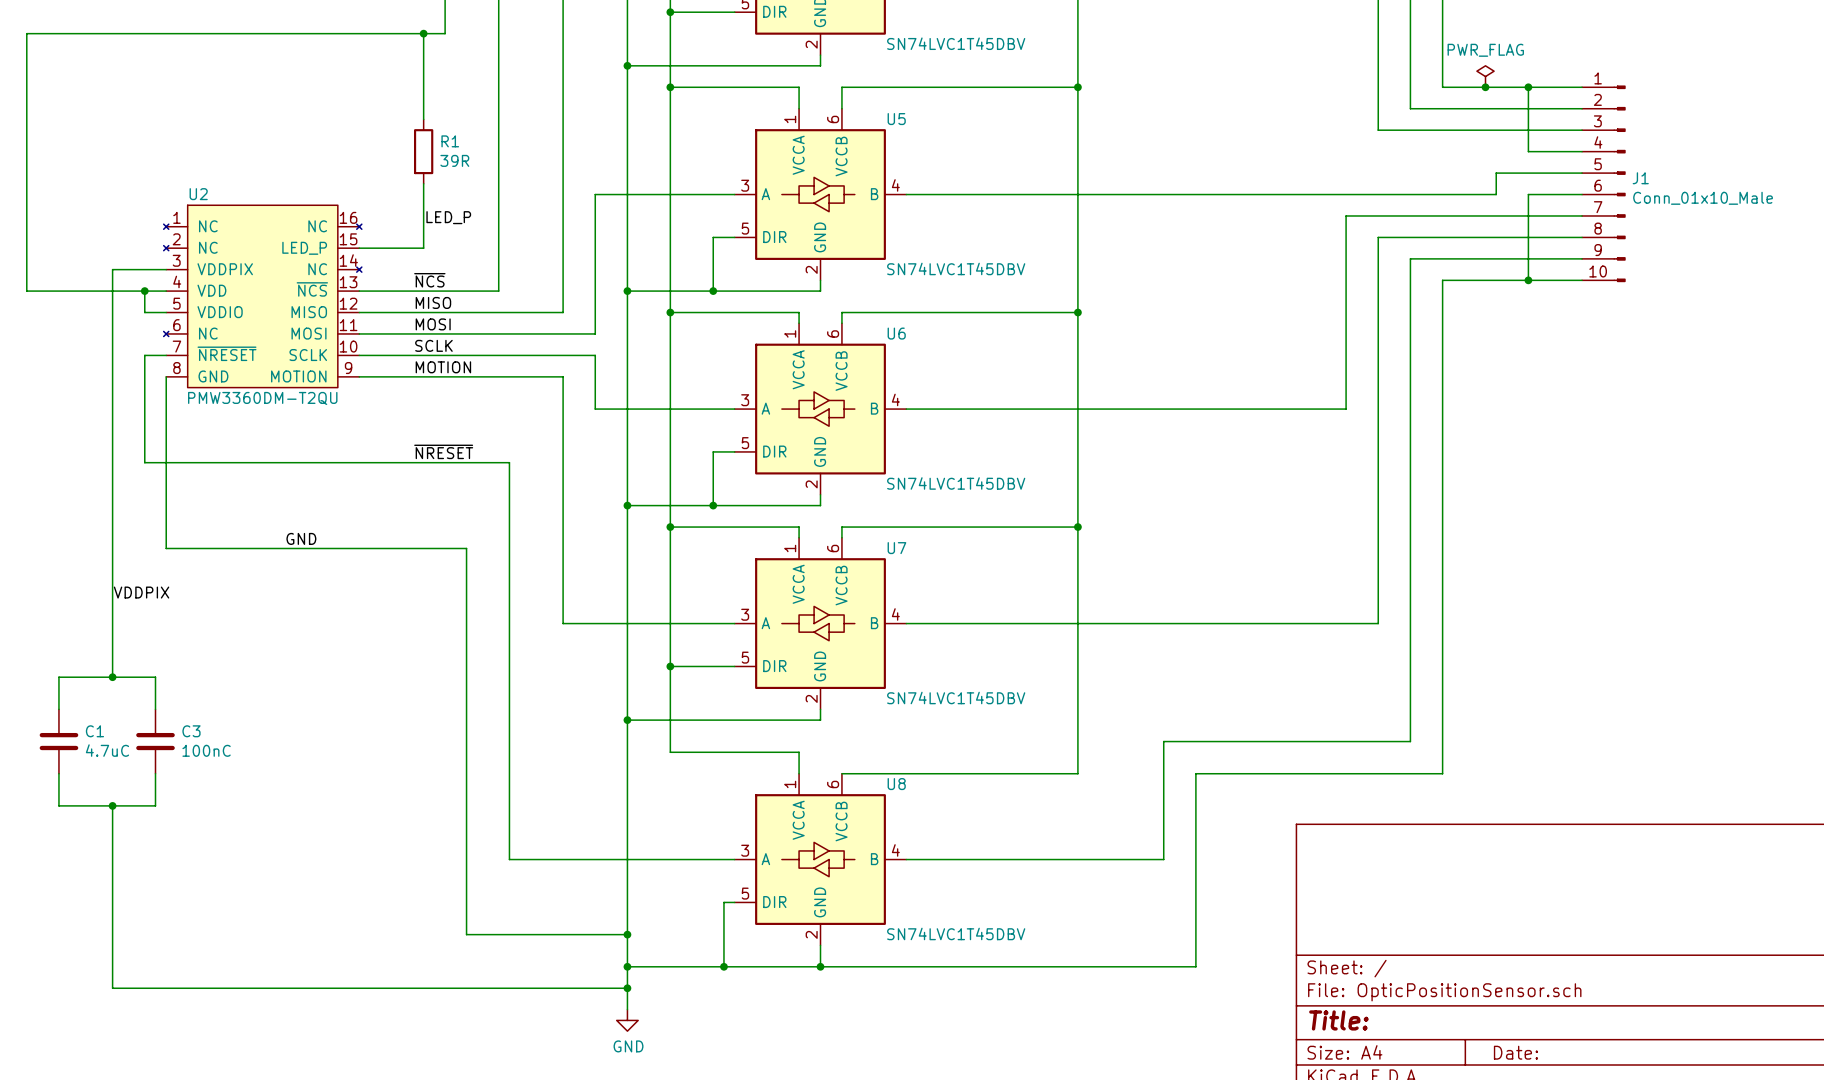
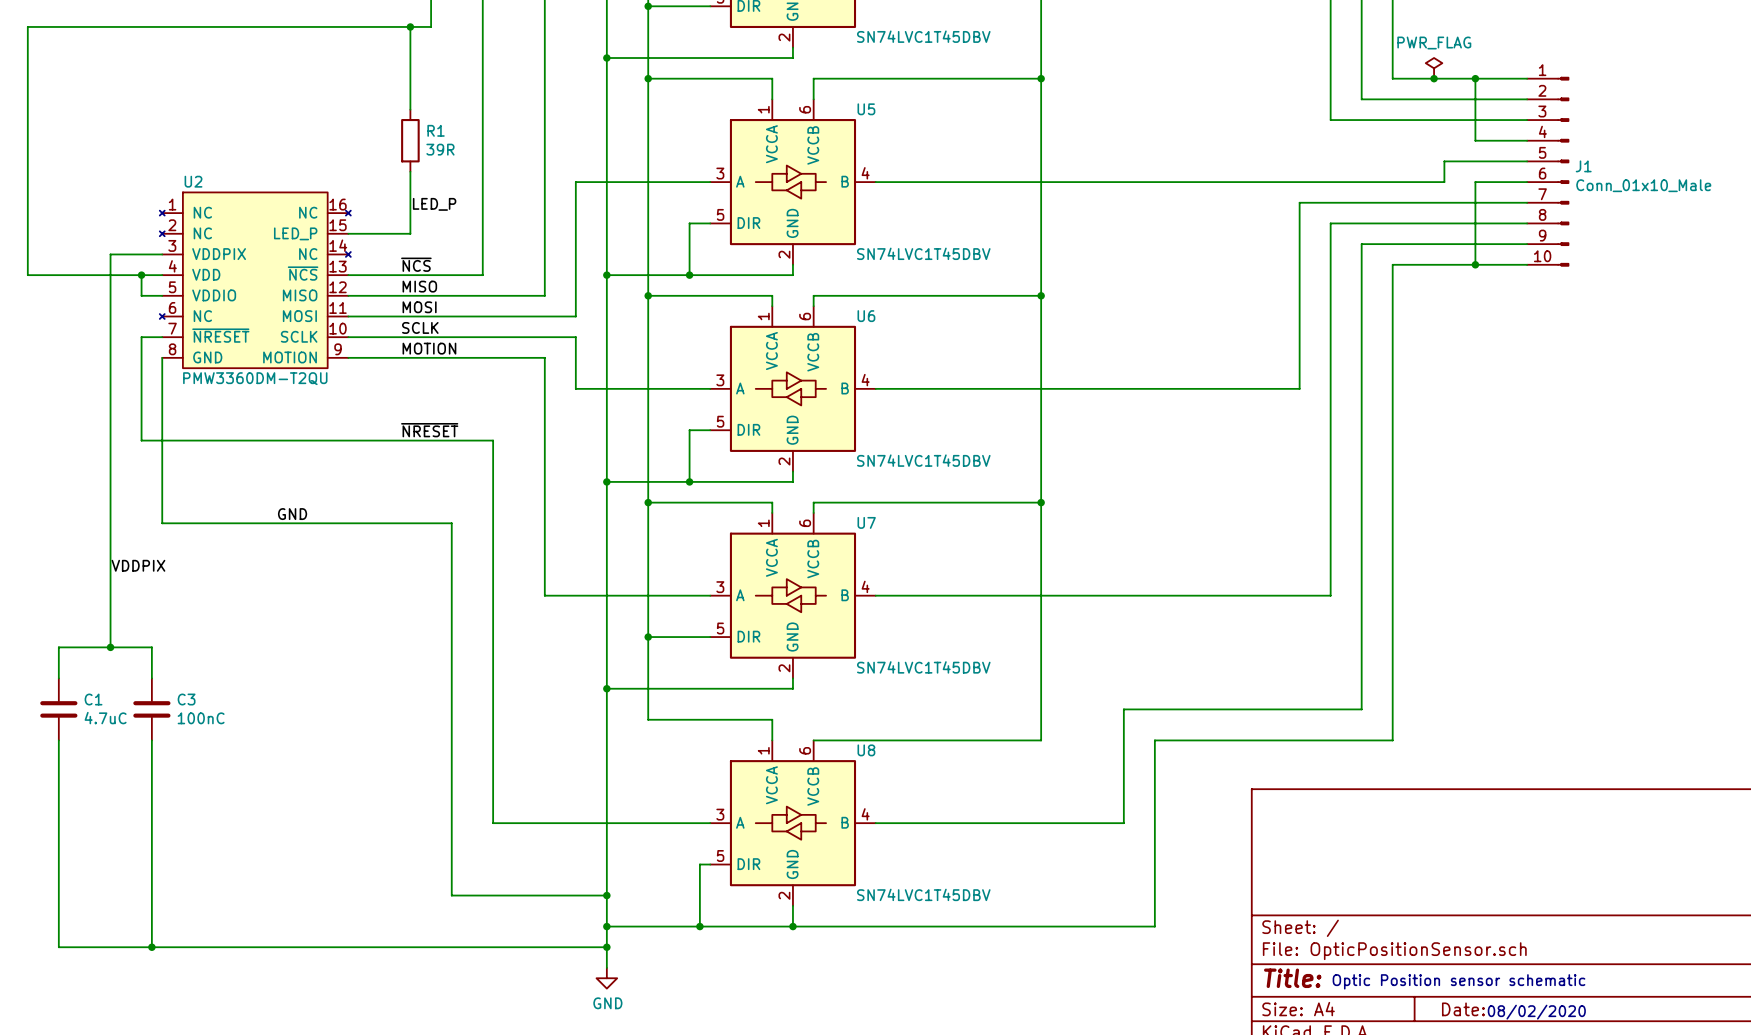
wire: (58, 805) (155, 805) -> (151, 947) (151, 771)
wire: (112, 805) (112, 988) -> (58, 771) (58, 947) (110, 947)
junction: (112, 805) -> none
junction: none -> (151, 947)
text: none -> Optic Position sensor schematic (1459, 981)
text: none -> 08/02/2020 (1536, 1012)

